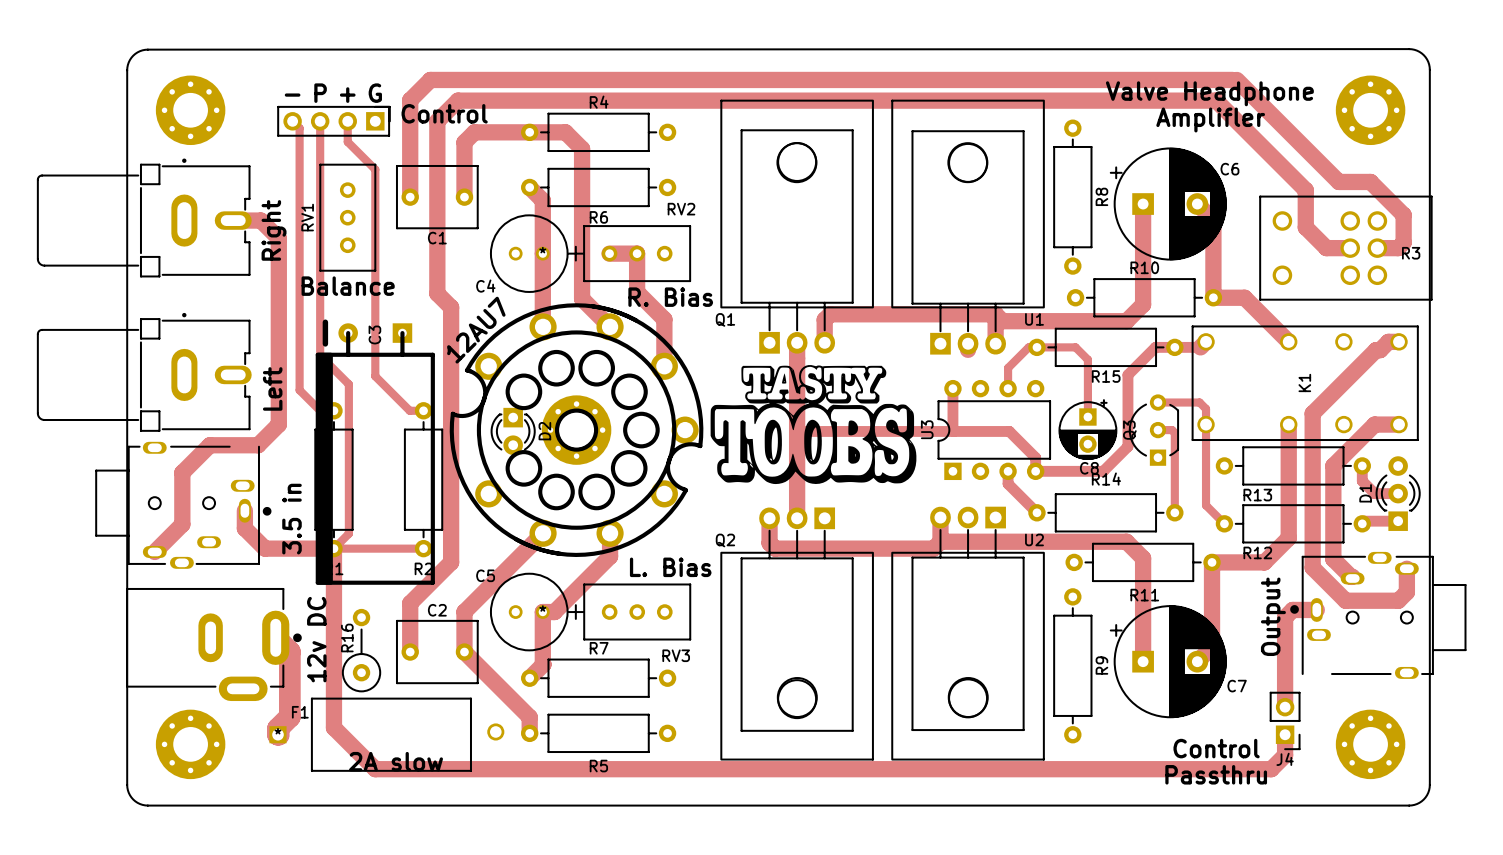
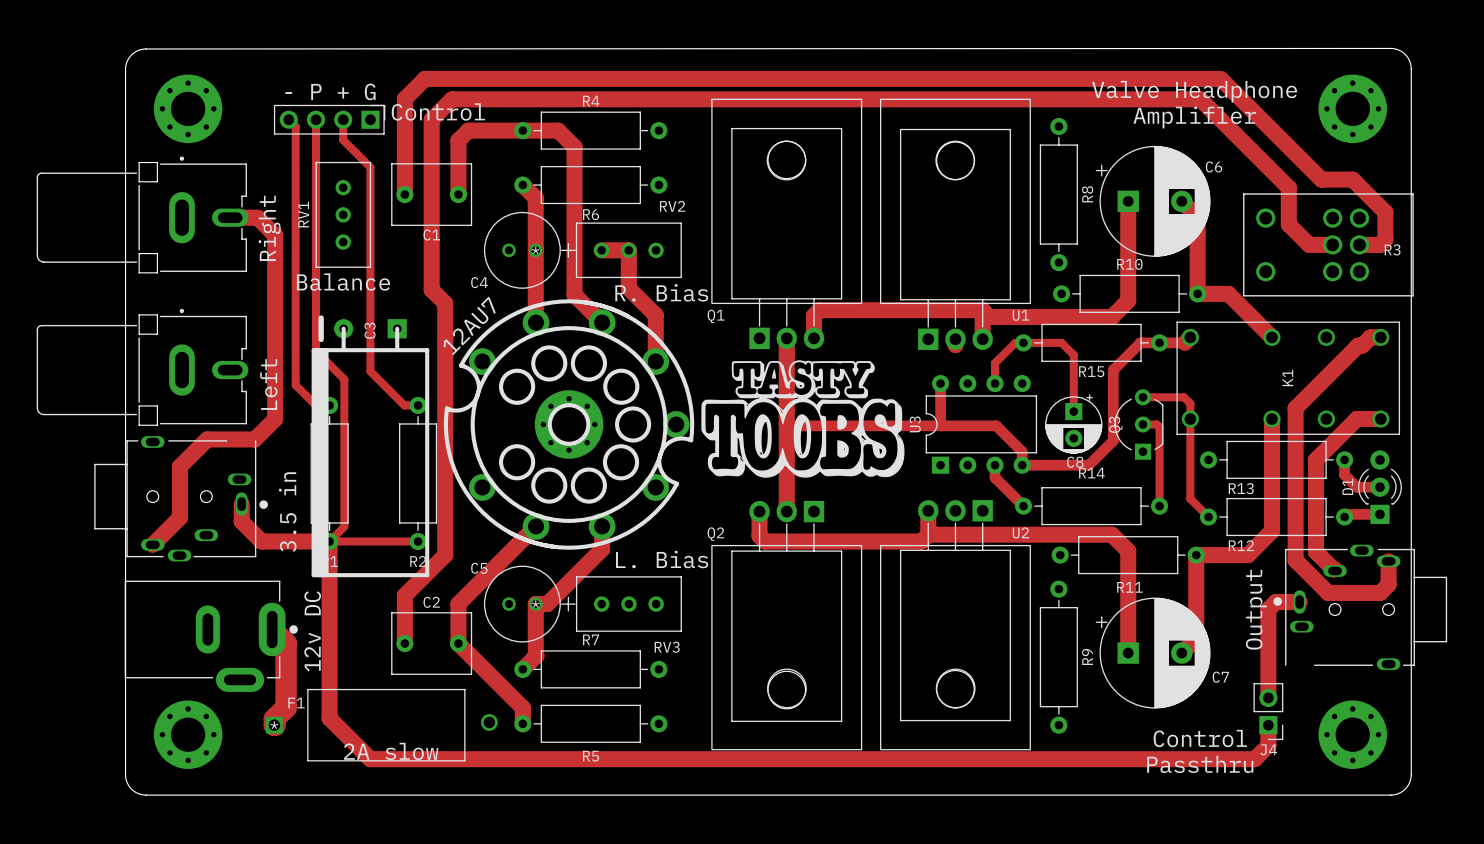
D2: (513, 431) -> none
R16: (361, 650) -> none

